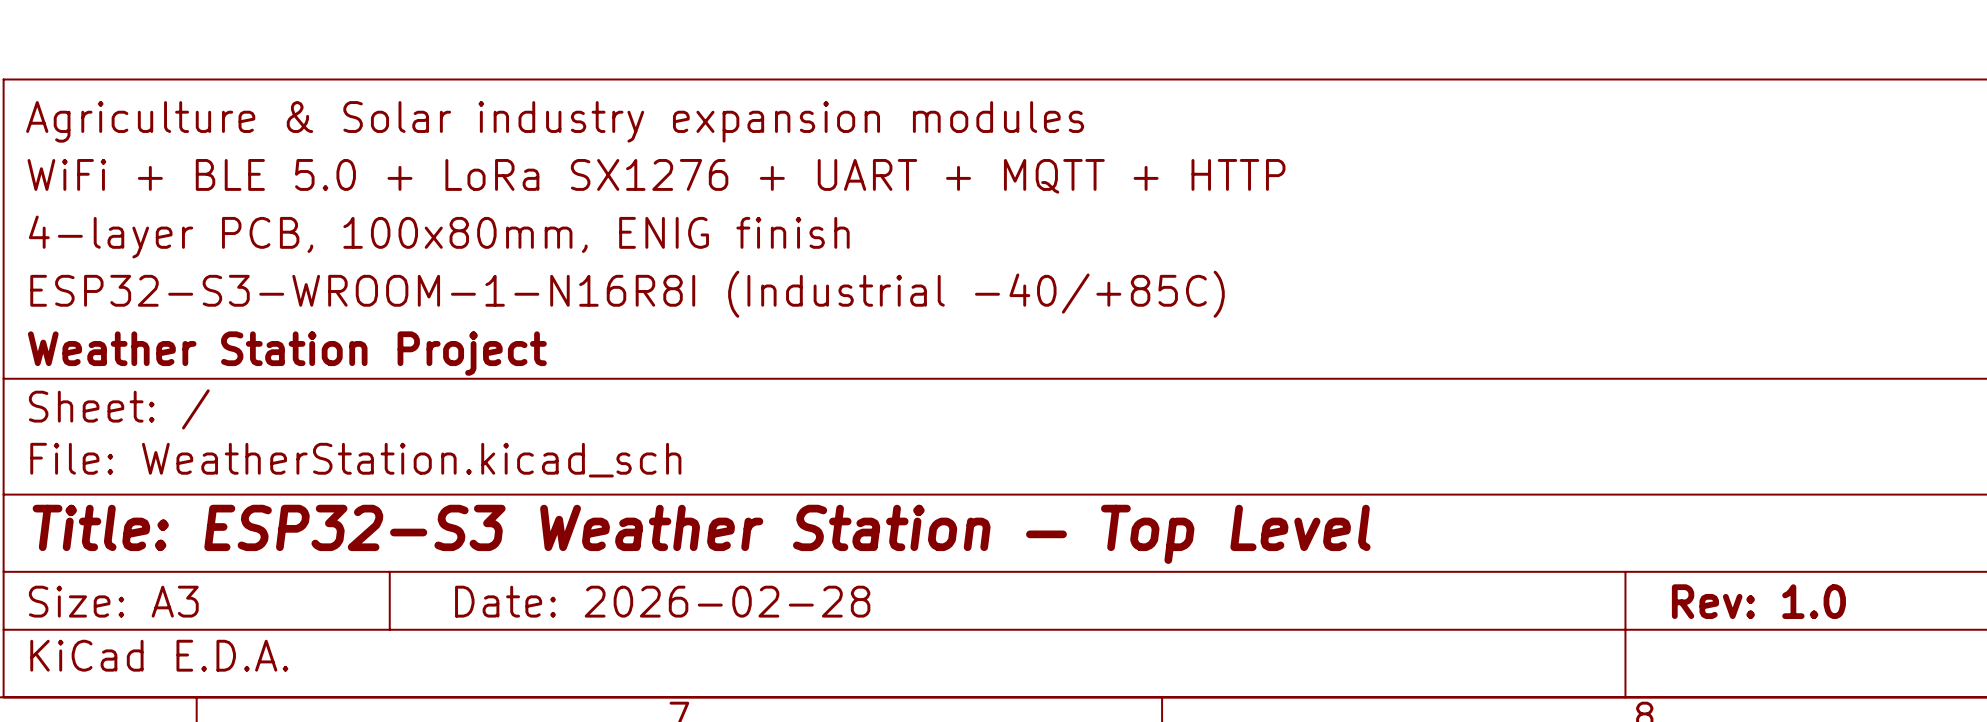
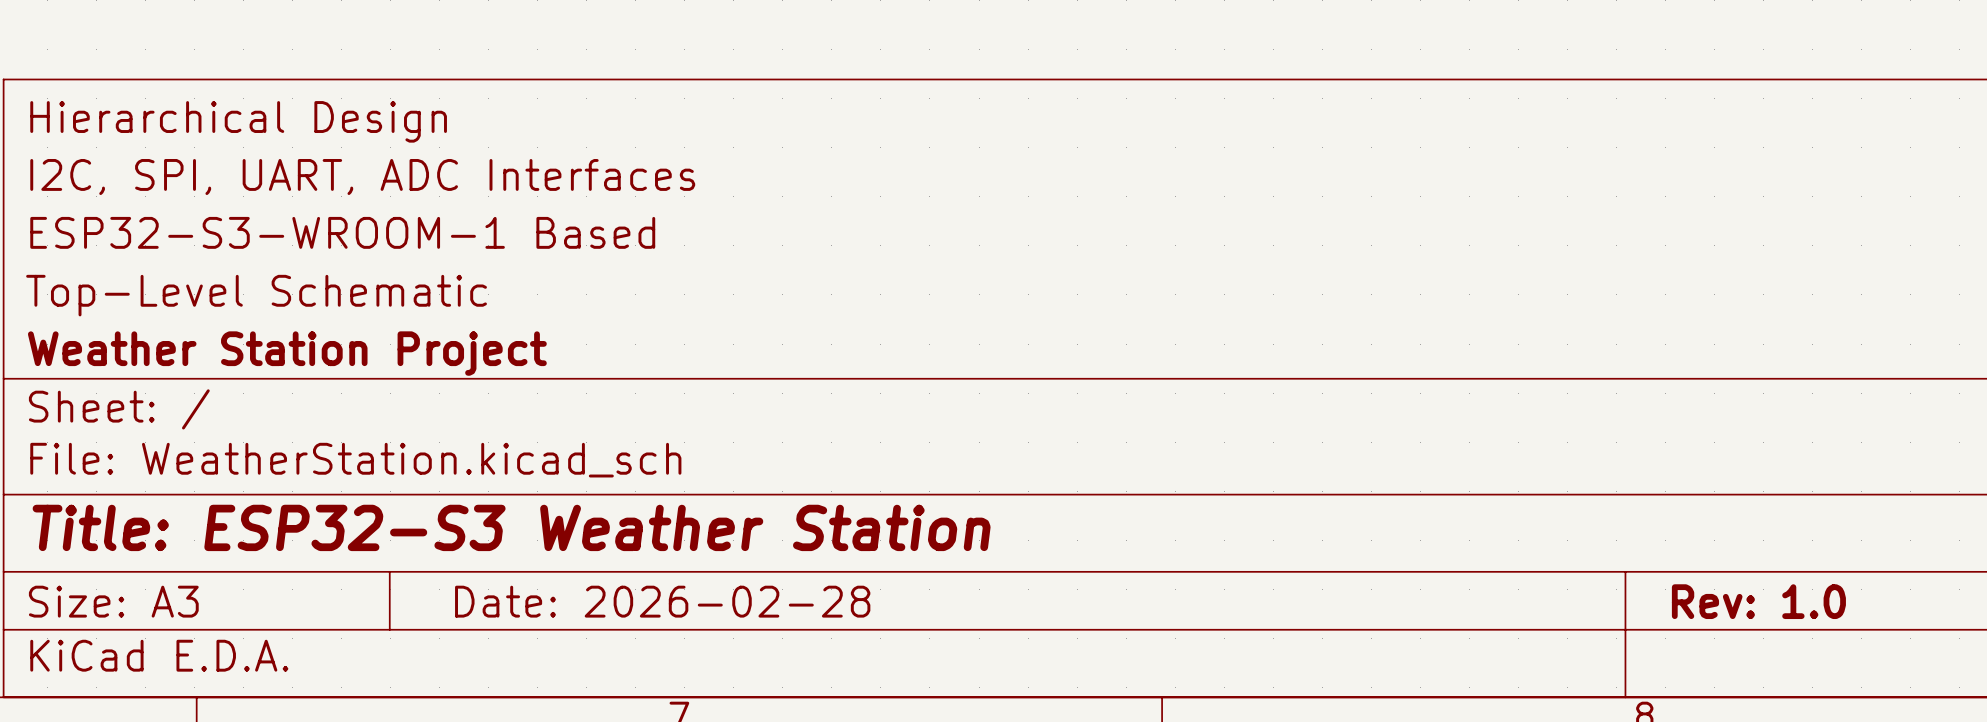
title block: Agriculture & Solar industry expansion modules (555, 121) -> Hierarchical Design (238, 121)
title block: WiFi + BLE 5.0 + LoRa SX1276 + UART + MQTT + HTTP (656, 176) -> I2C, SPI, UART, ADC Interfaces (362, 177)
title block: 4-layer PCB, 100x80mm, ENIG finish (439, 237) -> ESP32-S3-WROOM-1 Based (342, 232)
title block: ESP32-S3-WROOM-1-N16R8I (Industrial -40/+85C) (627, 294) -> Top-Level Schematic (256, 295)
title block: Title: ESP32-S3 Weather Station — Top Level (701, 534) -> Title: ESP32-S3 Weather Station (511, 527)

